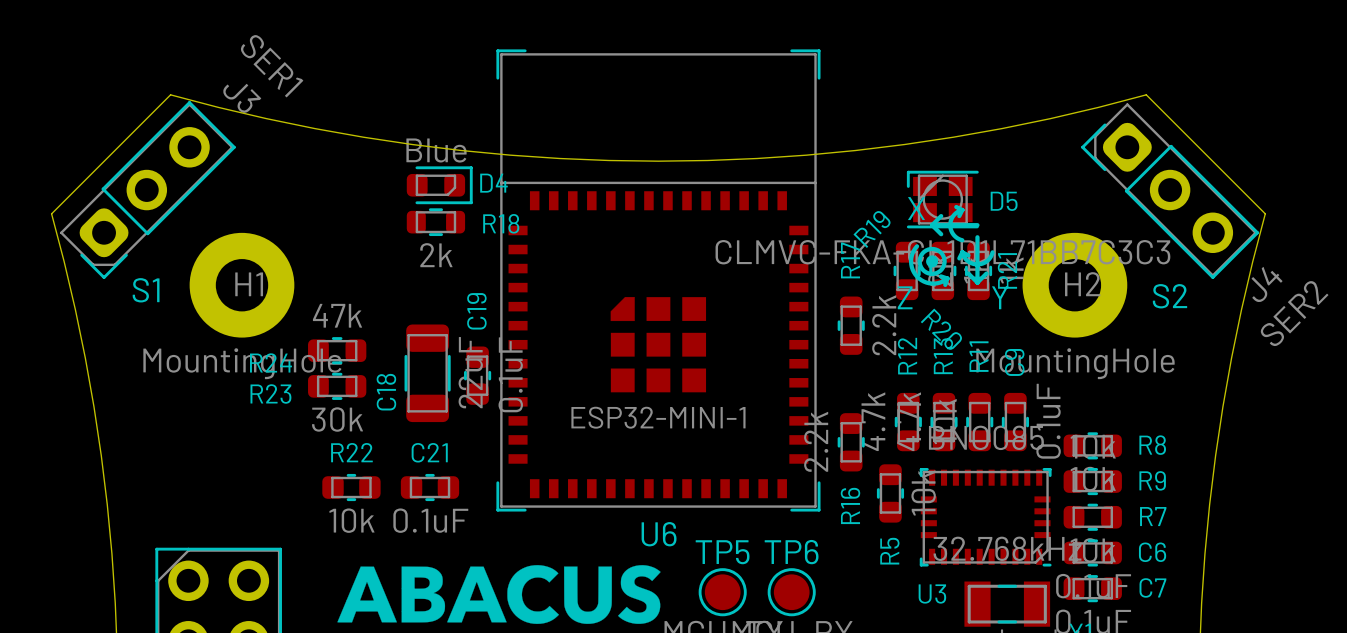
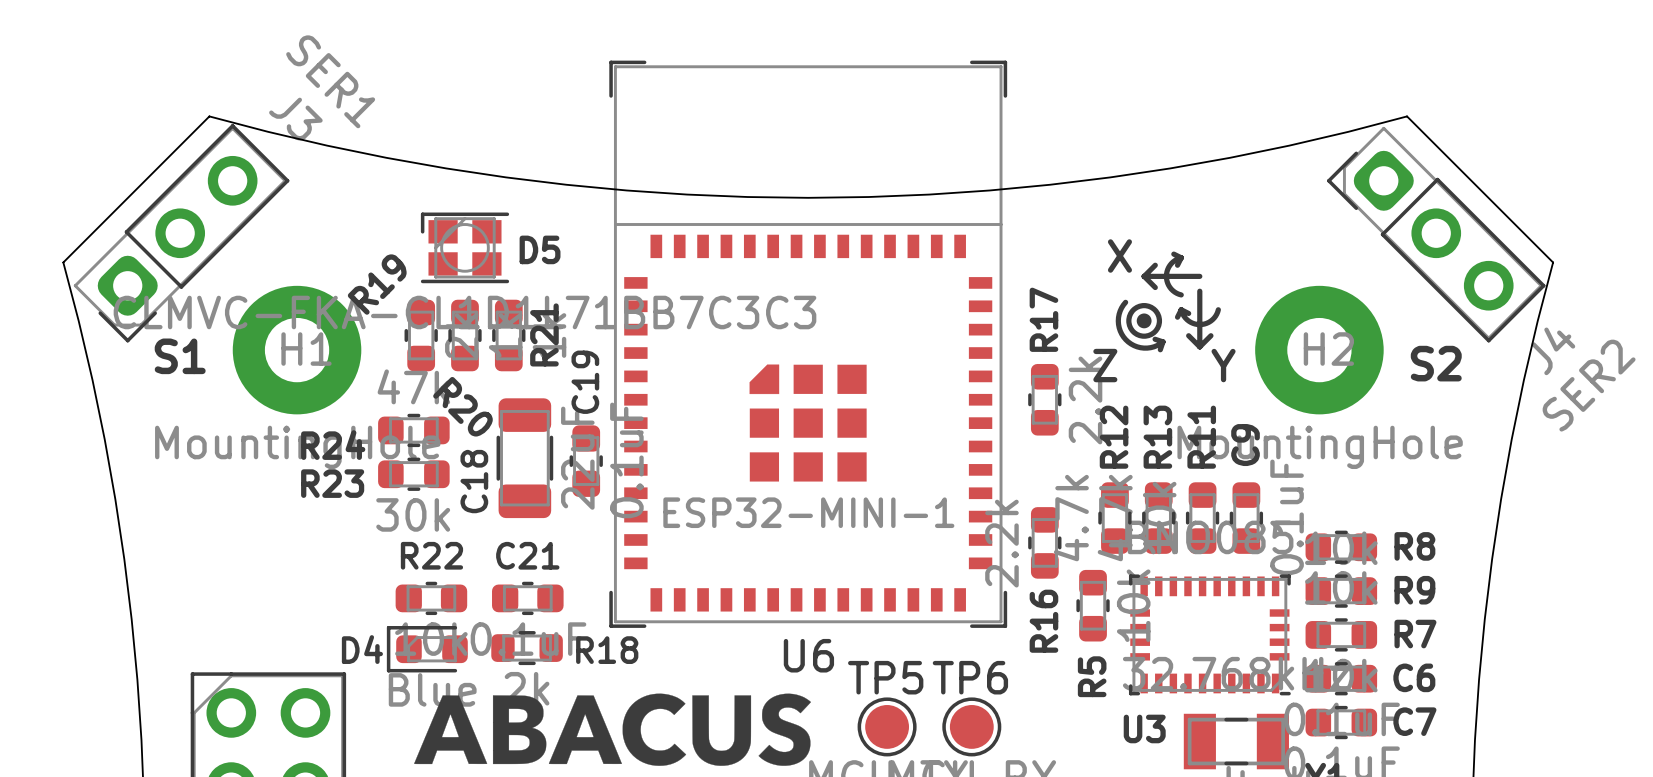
D4 rotation: 0° (439, 185) -> 180° (427, 649)
D4 position: (439, 185) -> (427, 649)
D5 position: (942, 199) -> (464, 247)
R18 position: (435, 222) -> (527, 648)
R19 position: (907, 270) -> (421, 335)
R20 position: (942, 270) -> (464, 335)
R21 position: (978, 270) -> (508, 335)

